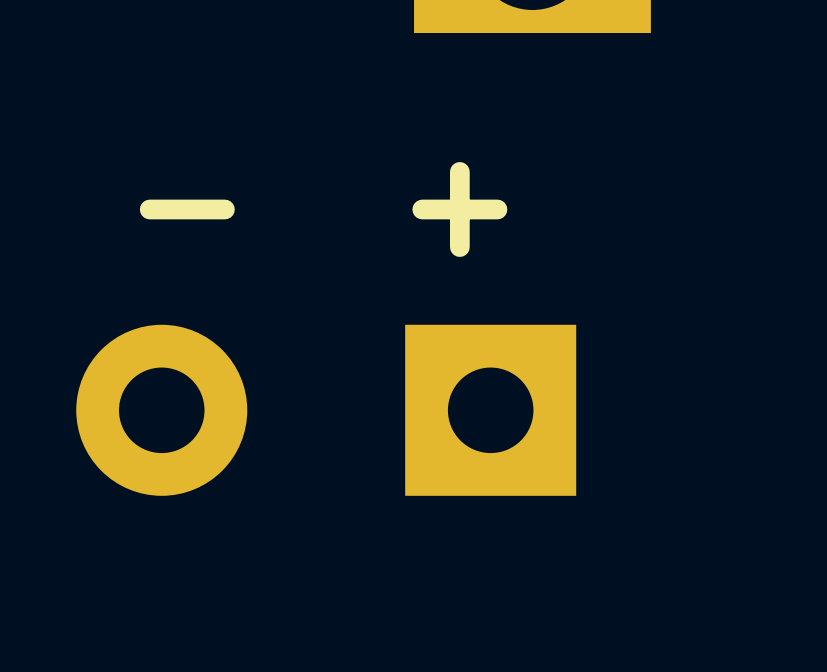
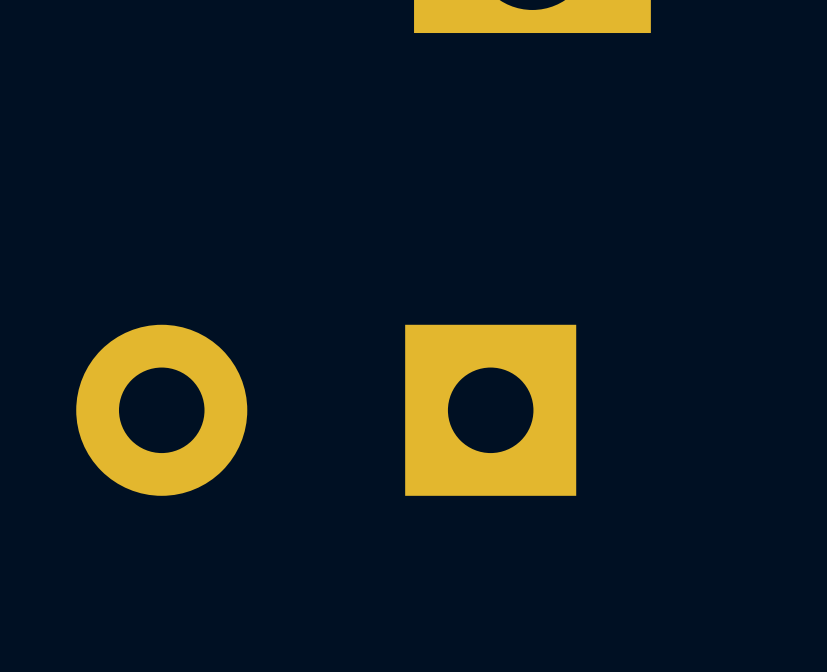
text: - + (323, 209) -> none

